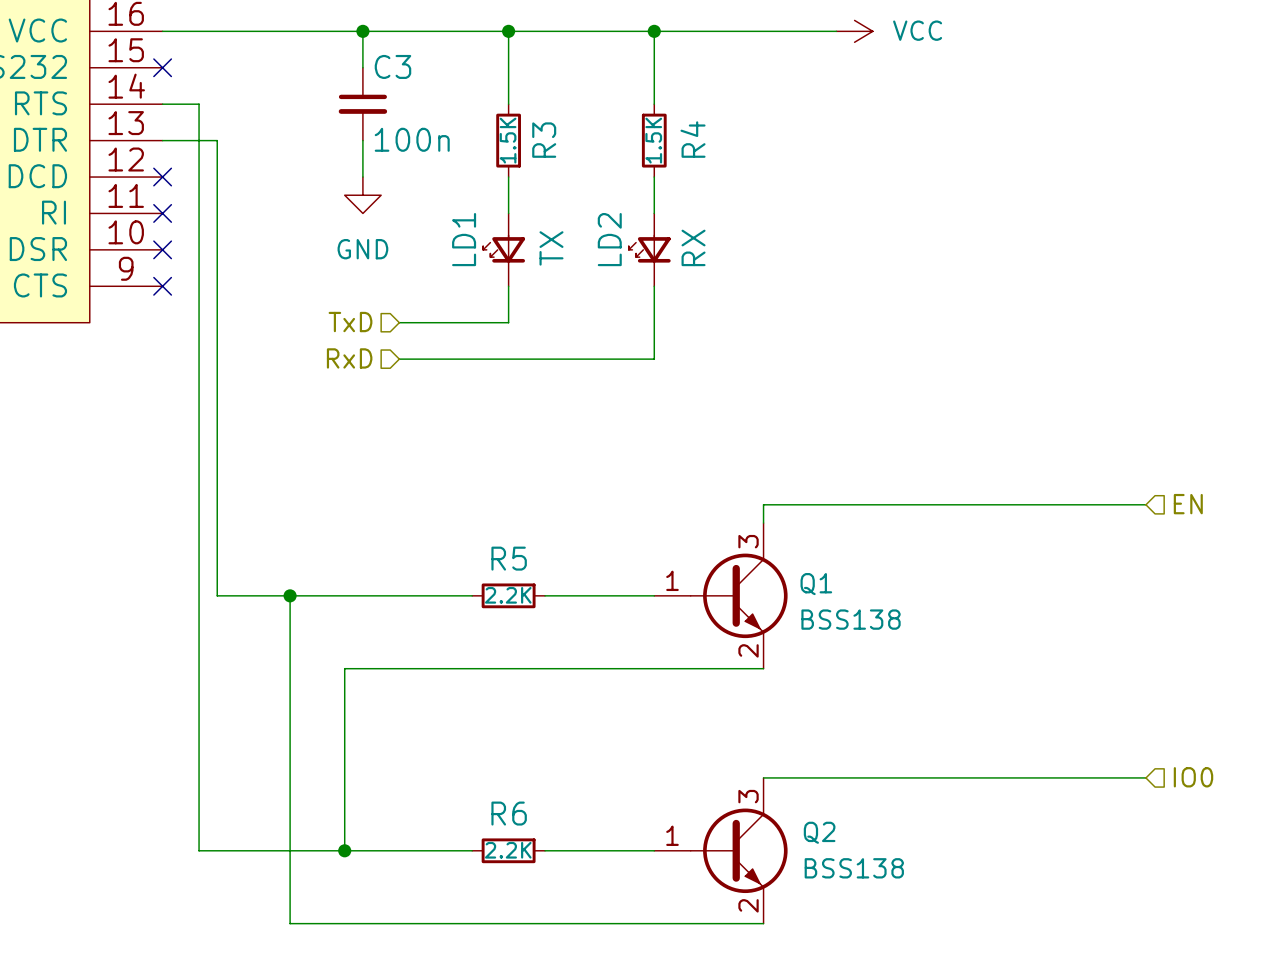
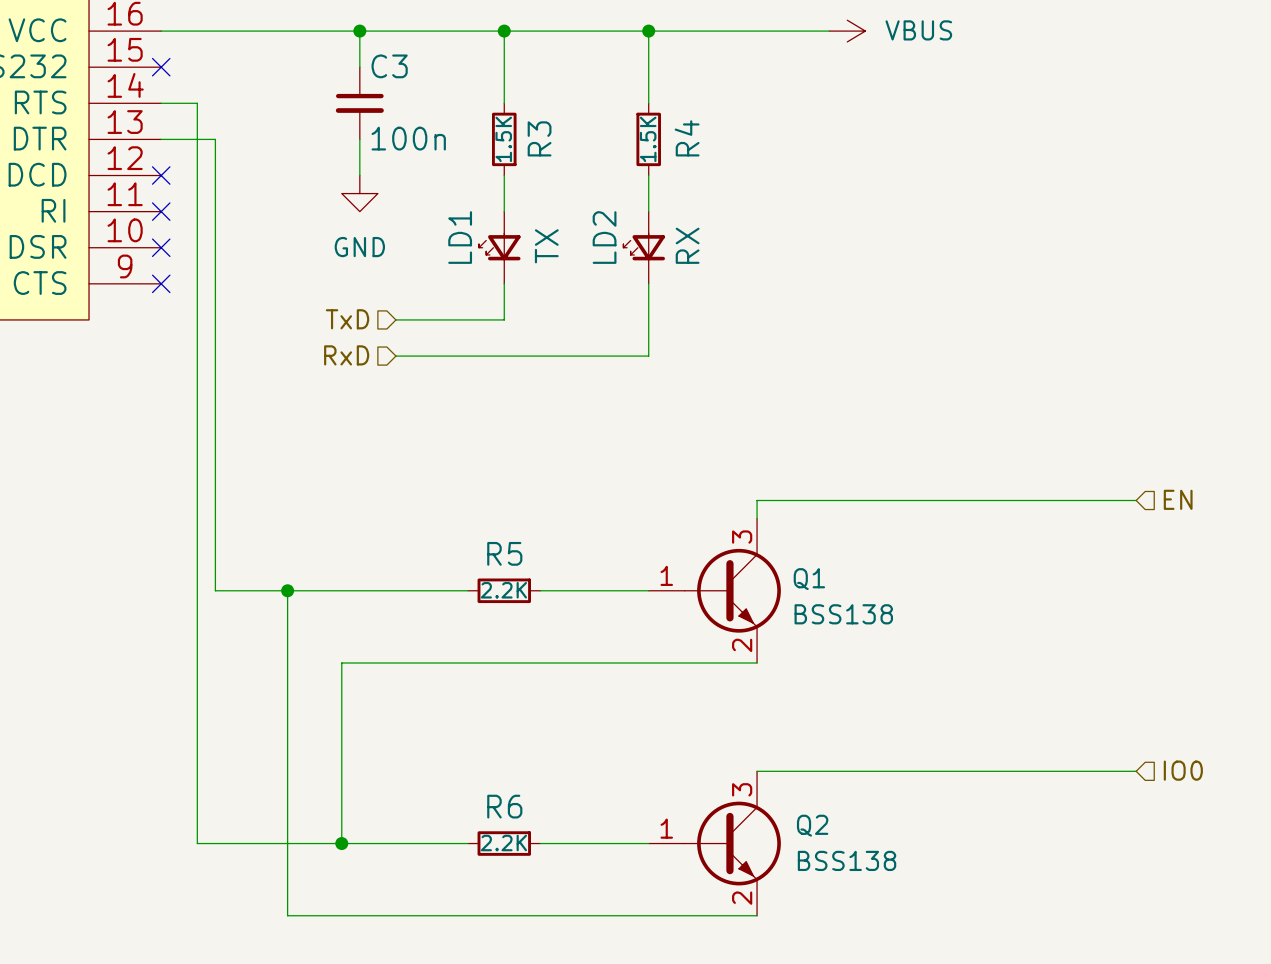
power symbol: VCC (854, 31) -> VBUS (847, 31)

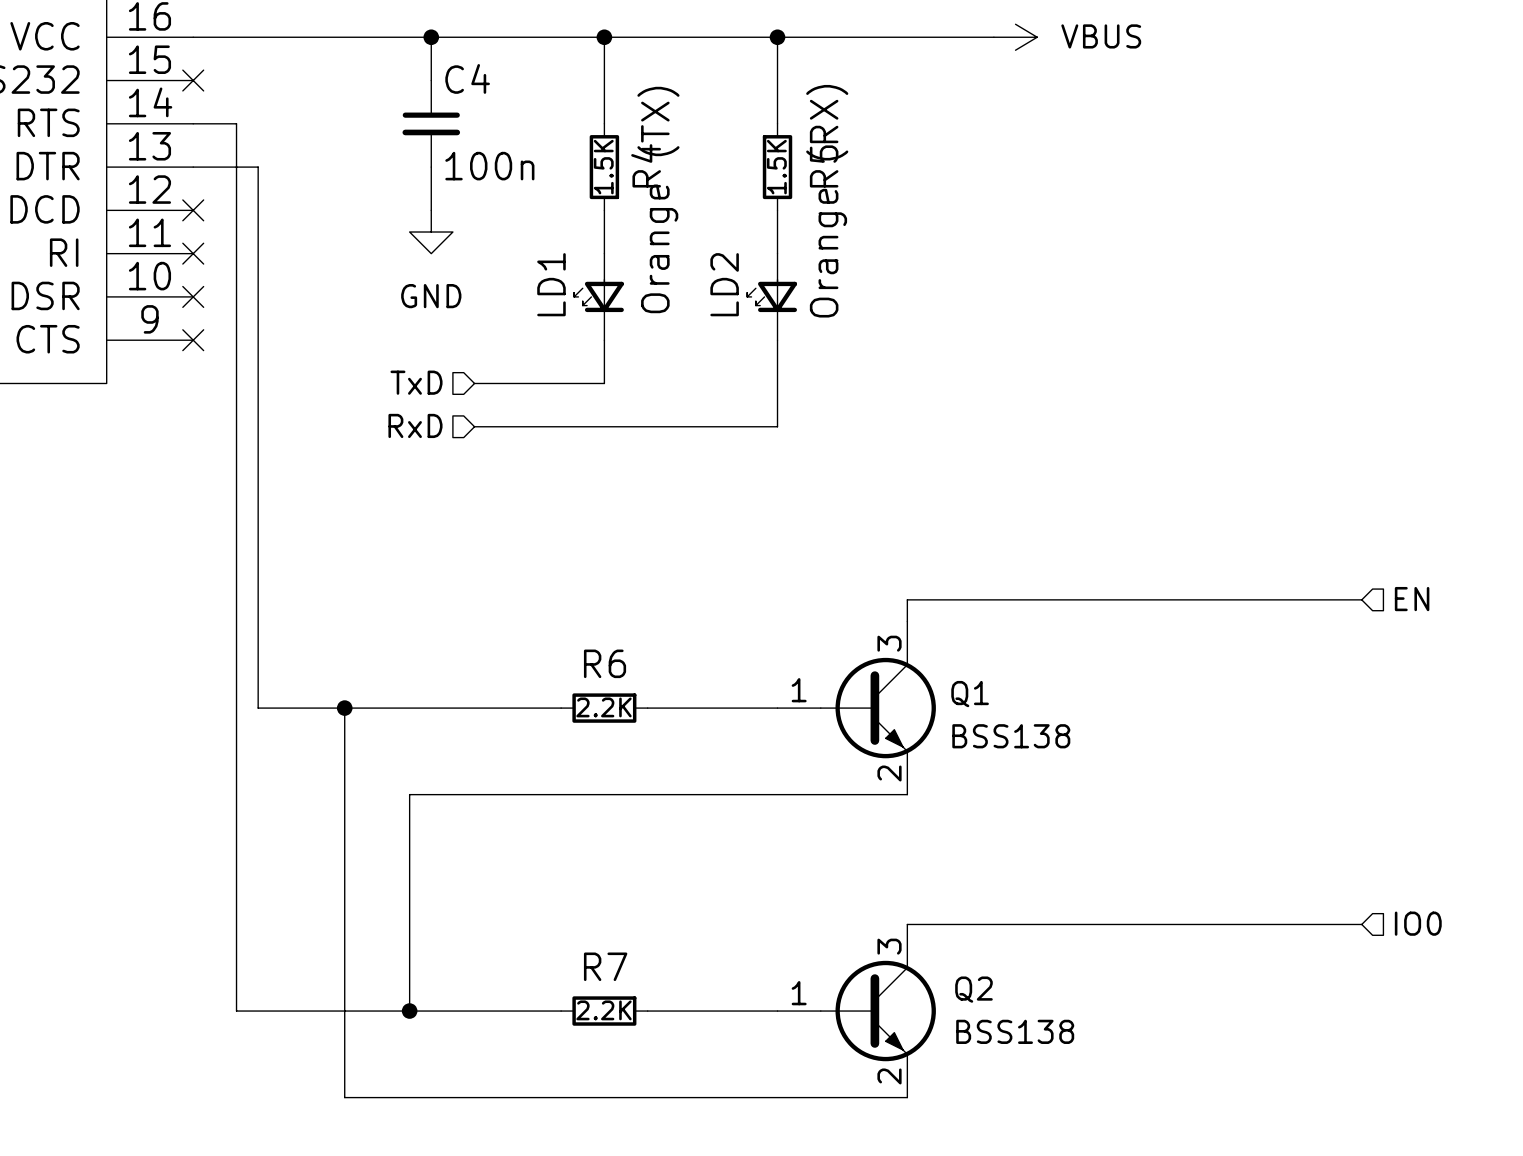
C3 name: C3 (389, 66) -> C4 (467, 78)
R3 name: R3 (539, 138) -> R4 (646, 165)
R4 name: R4 (687, 138) -> R5 (824, 166)
LD2 value: RX (687, 245) -> Orange (RX) (827, 201)
LD1 value: TX (546, 246) -> Orange (TX) (658, 200)
R5 name: R5 (504, 553) -> R6 (605, 663)
R6 name: R6 (504, 806) -> R7 (605, 966)

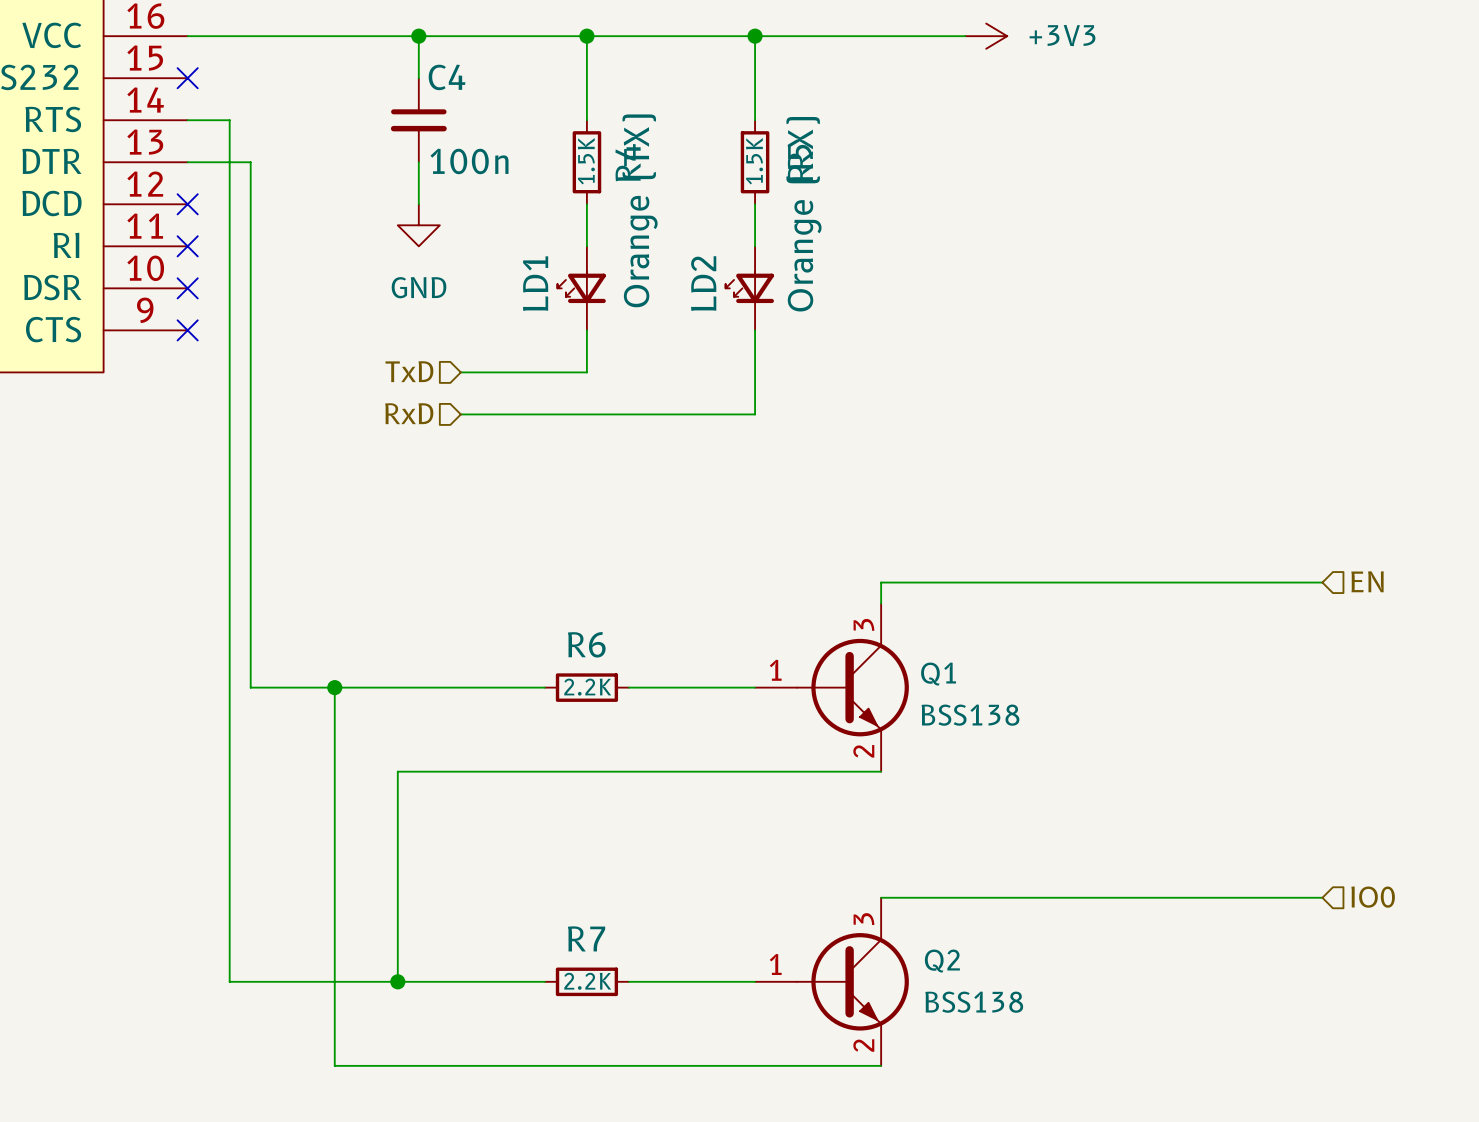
power symbol: VBUS (1015, 37) -> +3V3 (986, 36)

